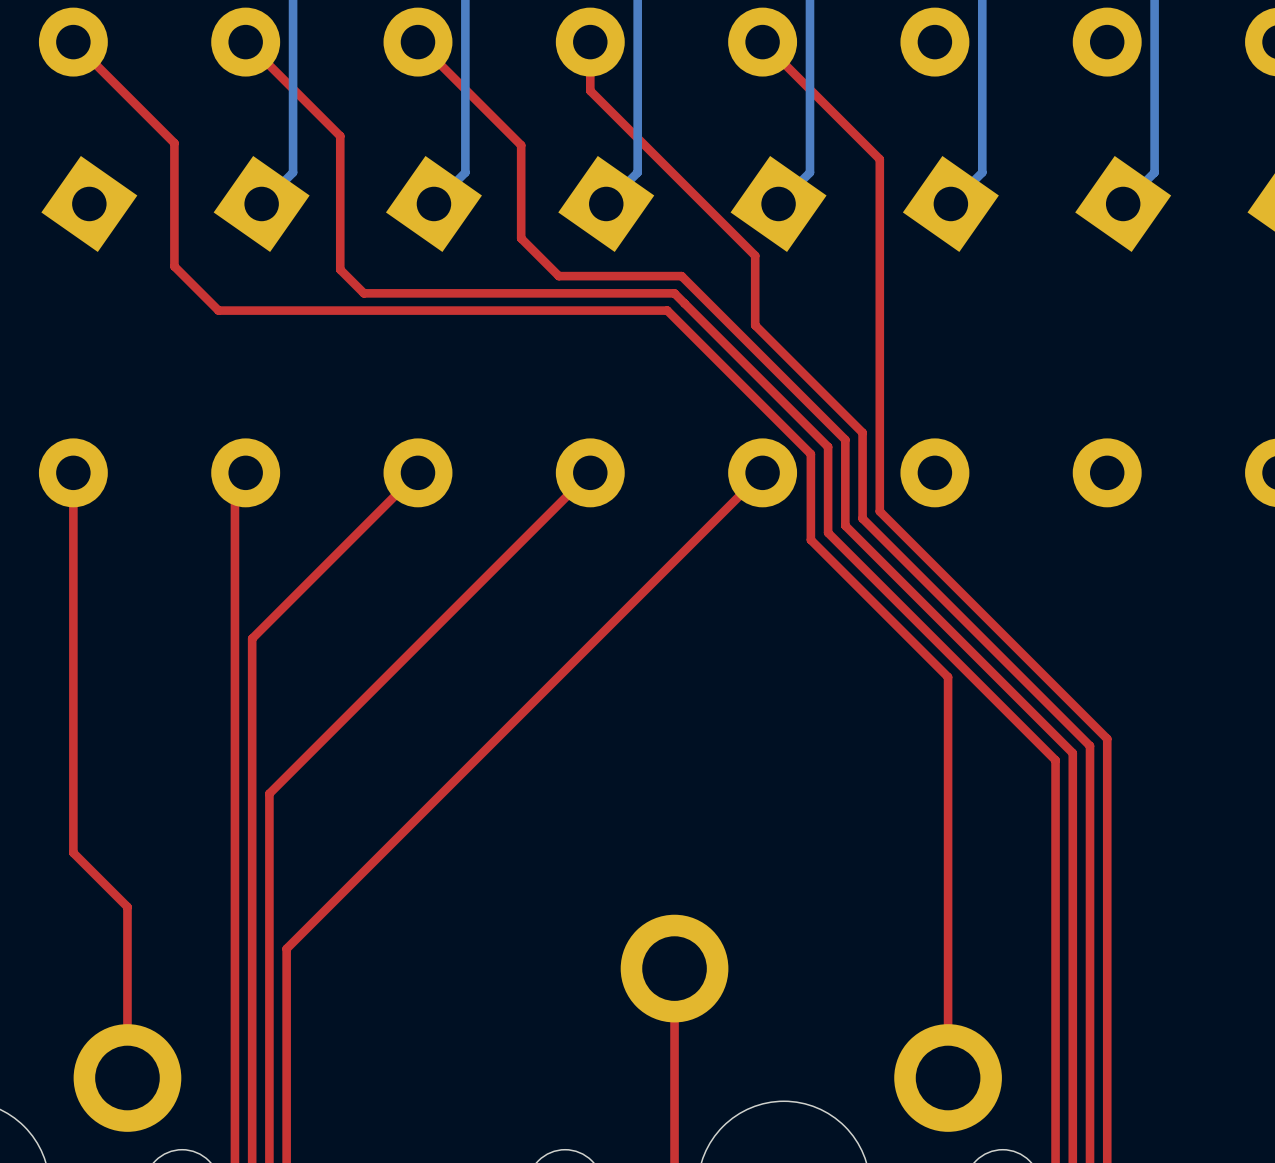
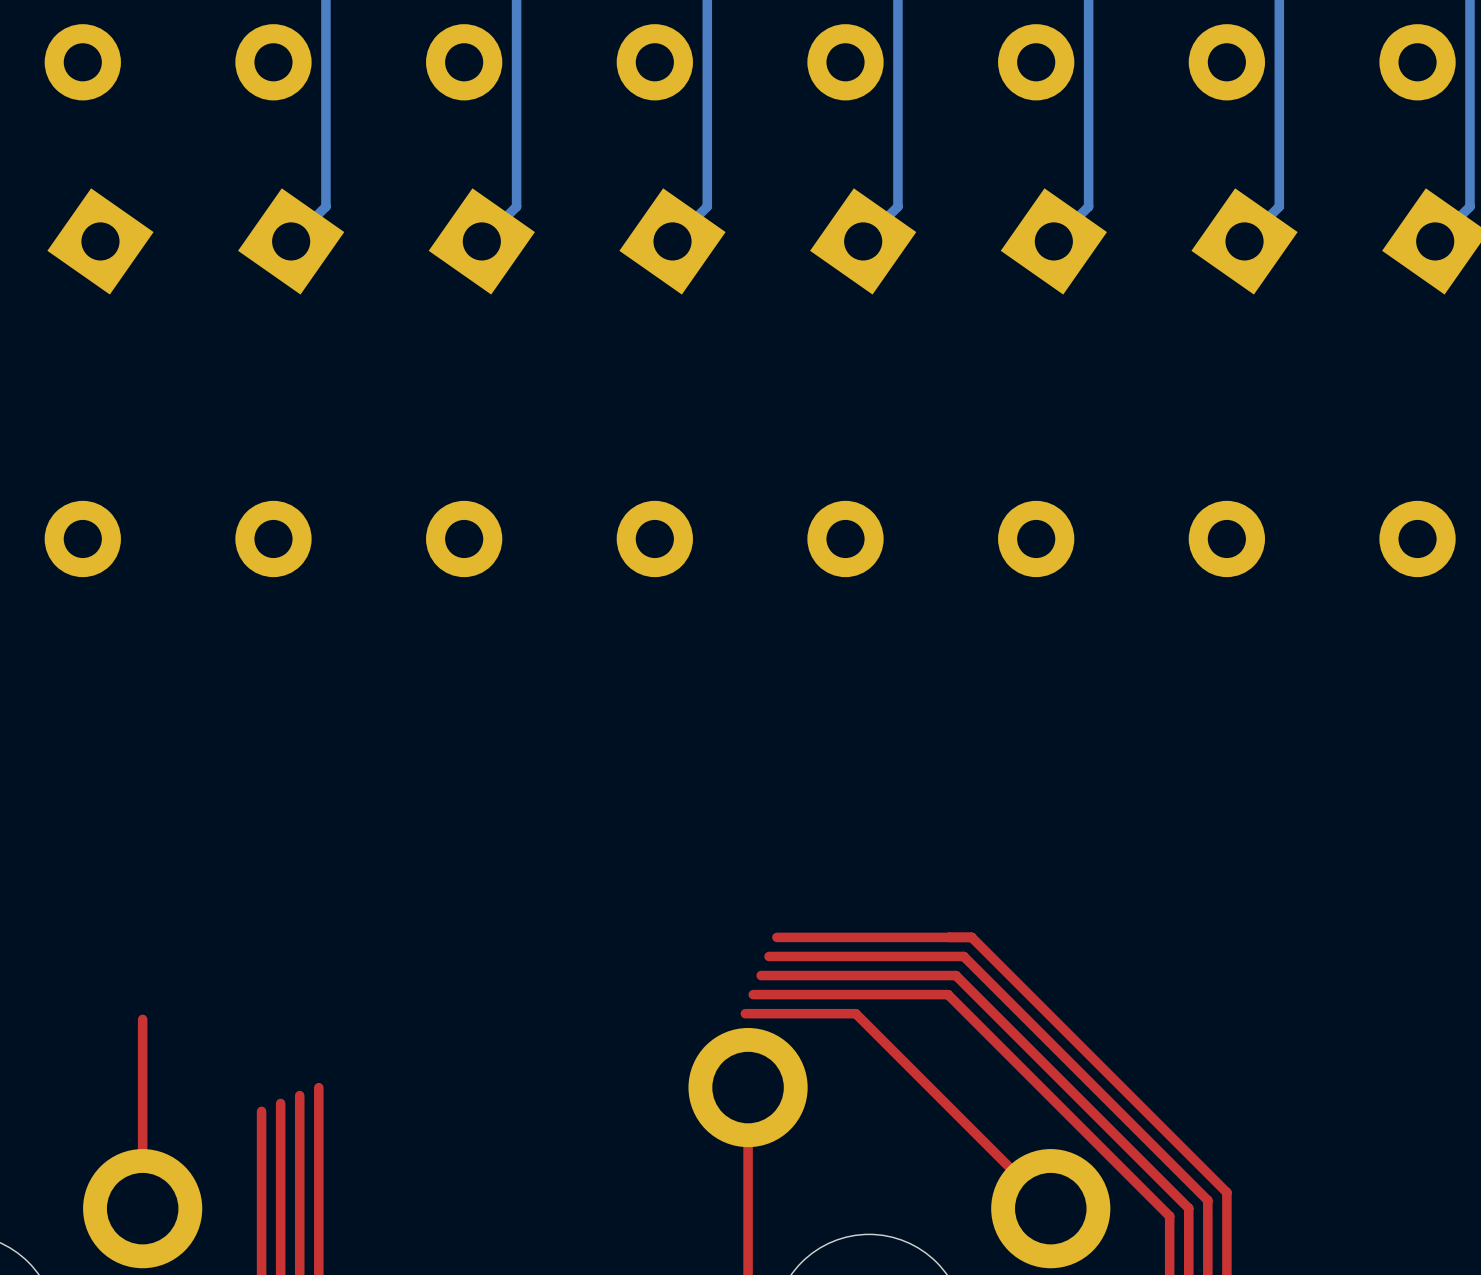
top track: (73, 42) (174, 143) (174, 266) (218, 310) (667, 310) (810, 454) (810, 539) (948, 677) (948, 1078) -> (745, 1013) (855, 1013) (1050, 1208)
top track: (246, 42) (340, 136) (340, 269) (363, 293) (674, 293) (828, 446) (828, 532) (1055, 760) (1055, 1084) -> (753, 994) (948, 994) (1169, 1216)
top track: (417, 42) (521, 145) (521, 238) (558, 276) (681, 276) (845, 439) (845, 525) (1072, 753) (1072, 1077) -> (761, 975) (955, 975) (1188, 1208)
top track: (590, 42) (590, 90) (755, 255) (755, 325) (862, 432) (862, 518) (1090, 746) (1090, 1070) -> (769, 956) (963, 956) (1207, 1200)
top track: (762, 42) (879, 159) (879, 511) (1107, 738) (1107, 1063) -> (776, 937) (971, 937) (1226, 1192)
top track: (73, 472) (73, 852) (127, 906) -> none
top track: (245, 472) (234, 483) (234, 990) -> none
top track: (417, 472) (252, 638) (252, 982) -> none
top track: (590, 472) (269, 793) (269, 975) -> none
top track: (762, 472) (286, 948) (286, 968) -> none

